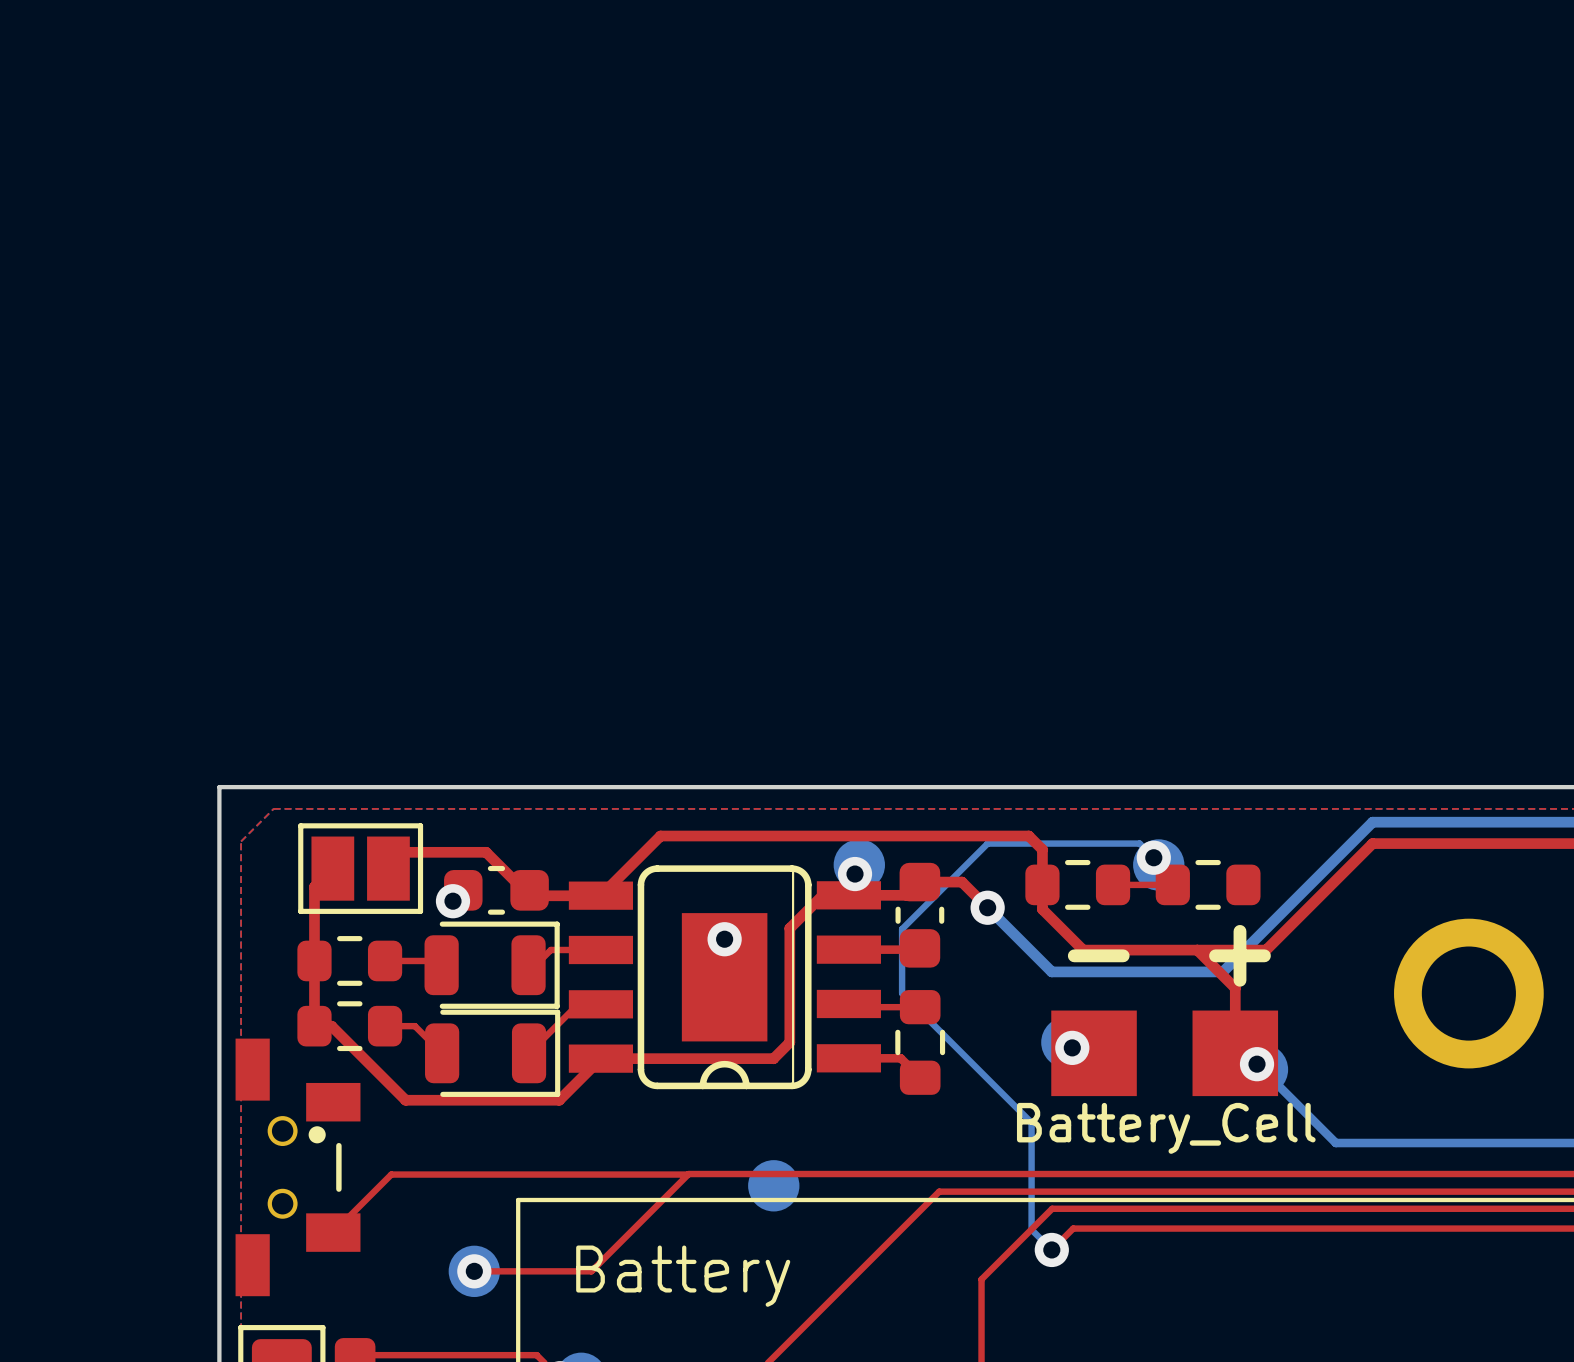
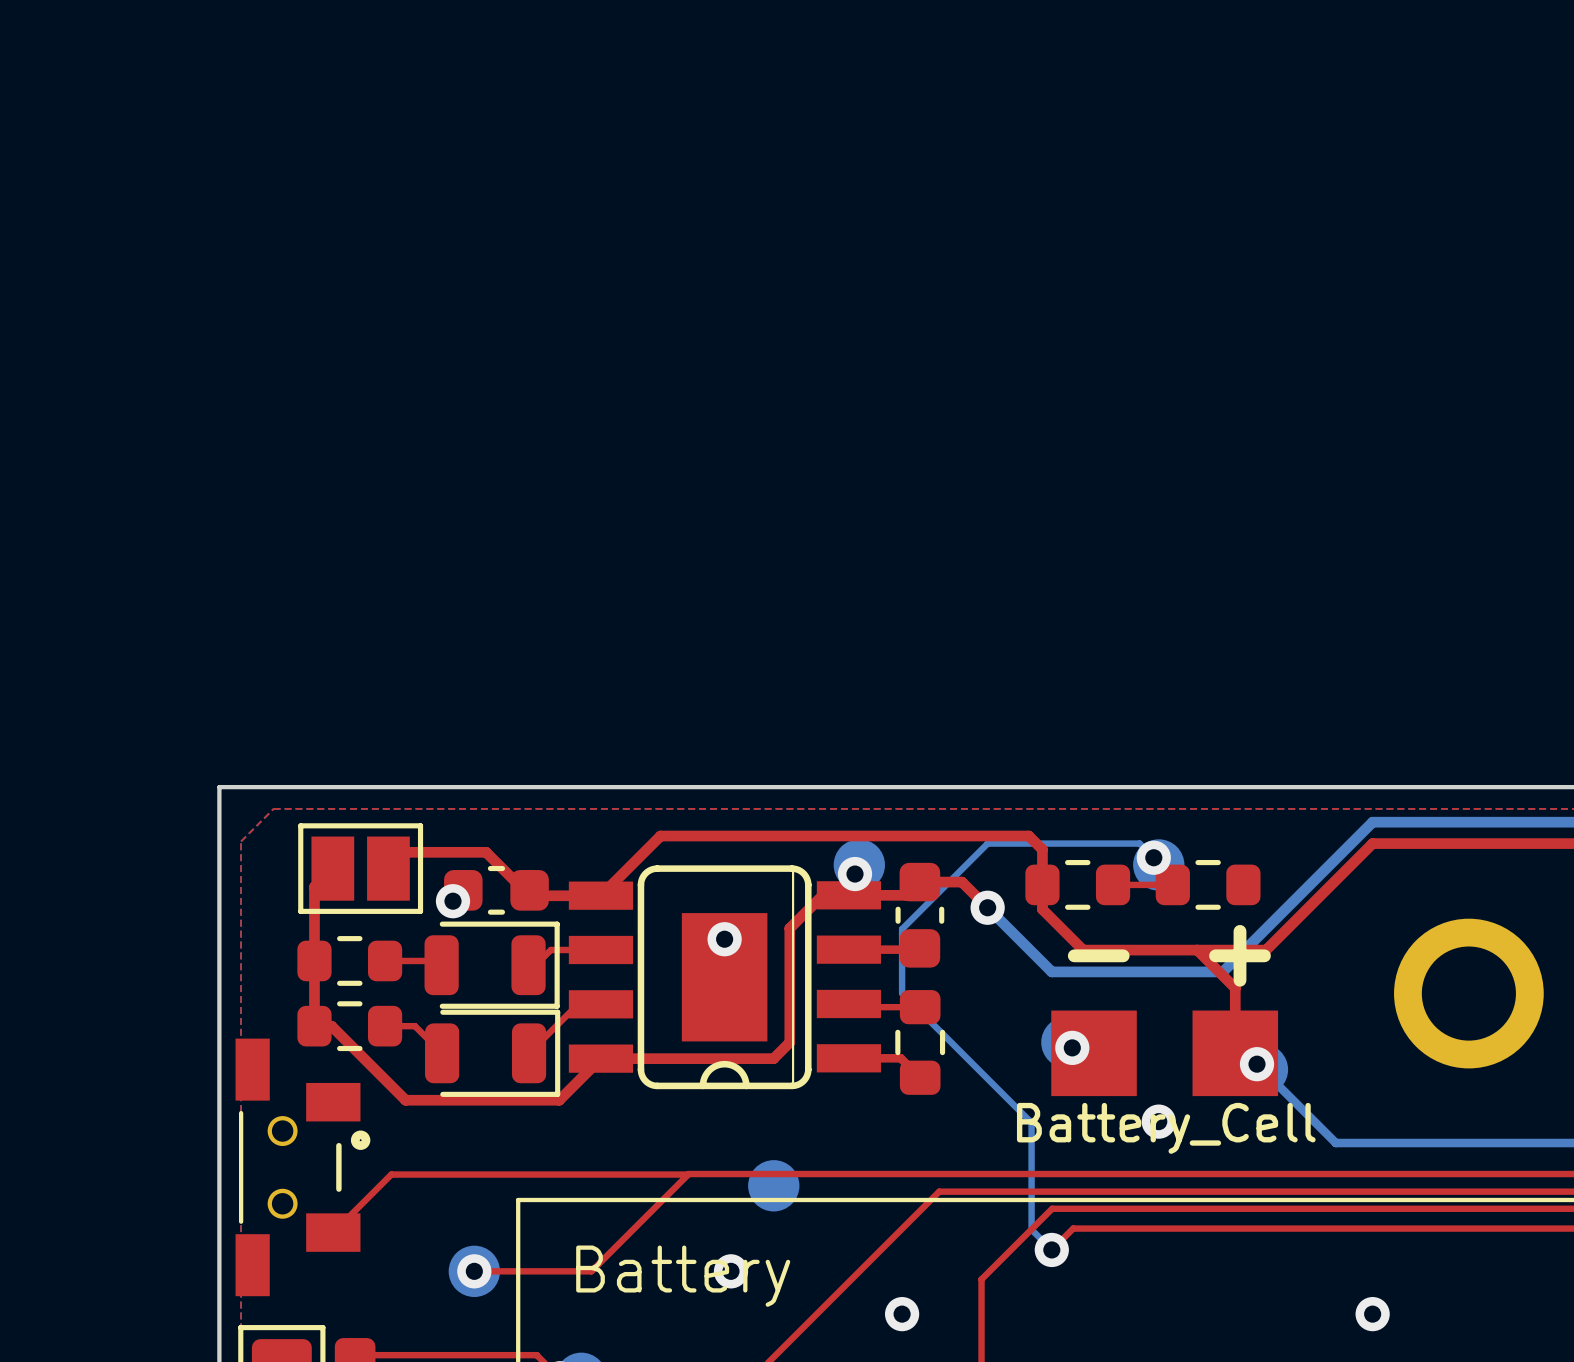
part footprint: [235, 1038, 361, 1297] -> [235, 1038, 371, 1297]
via: none -> (1158, 1121)
via: none -> (731, 1271)
via: none -> (902, 1314)
via: none -> (1372, 1314)

